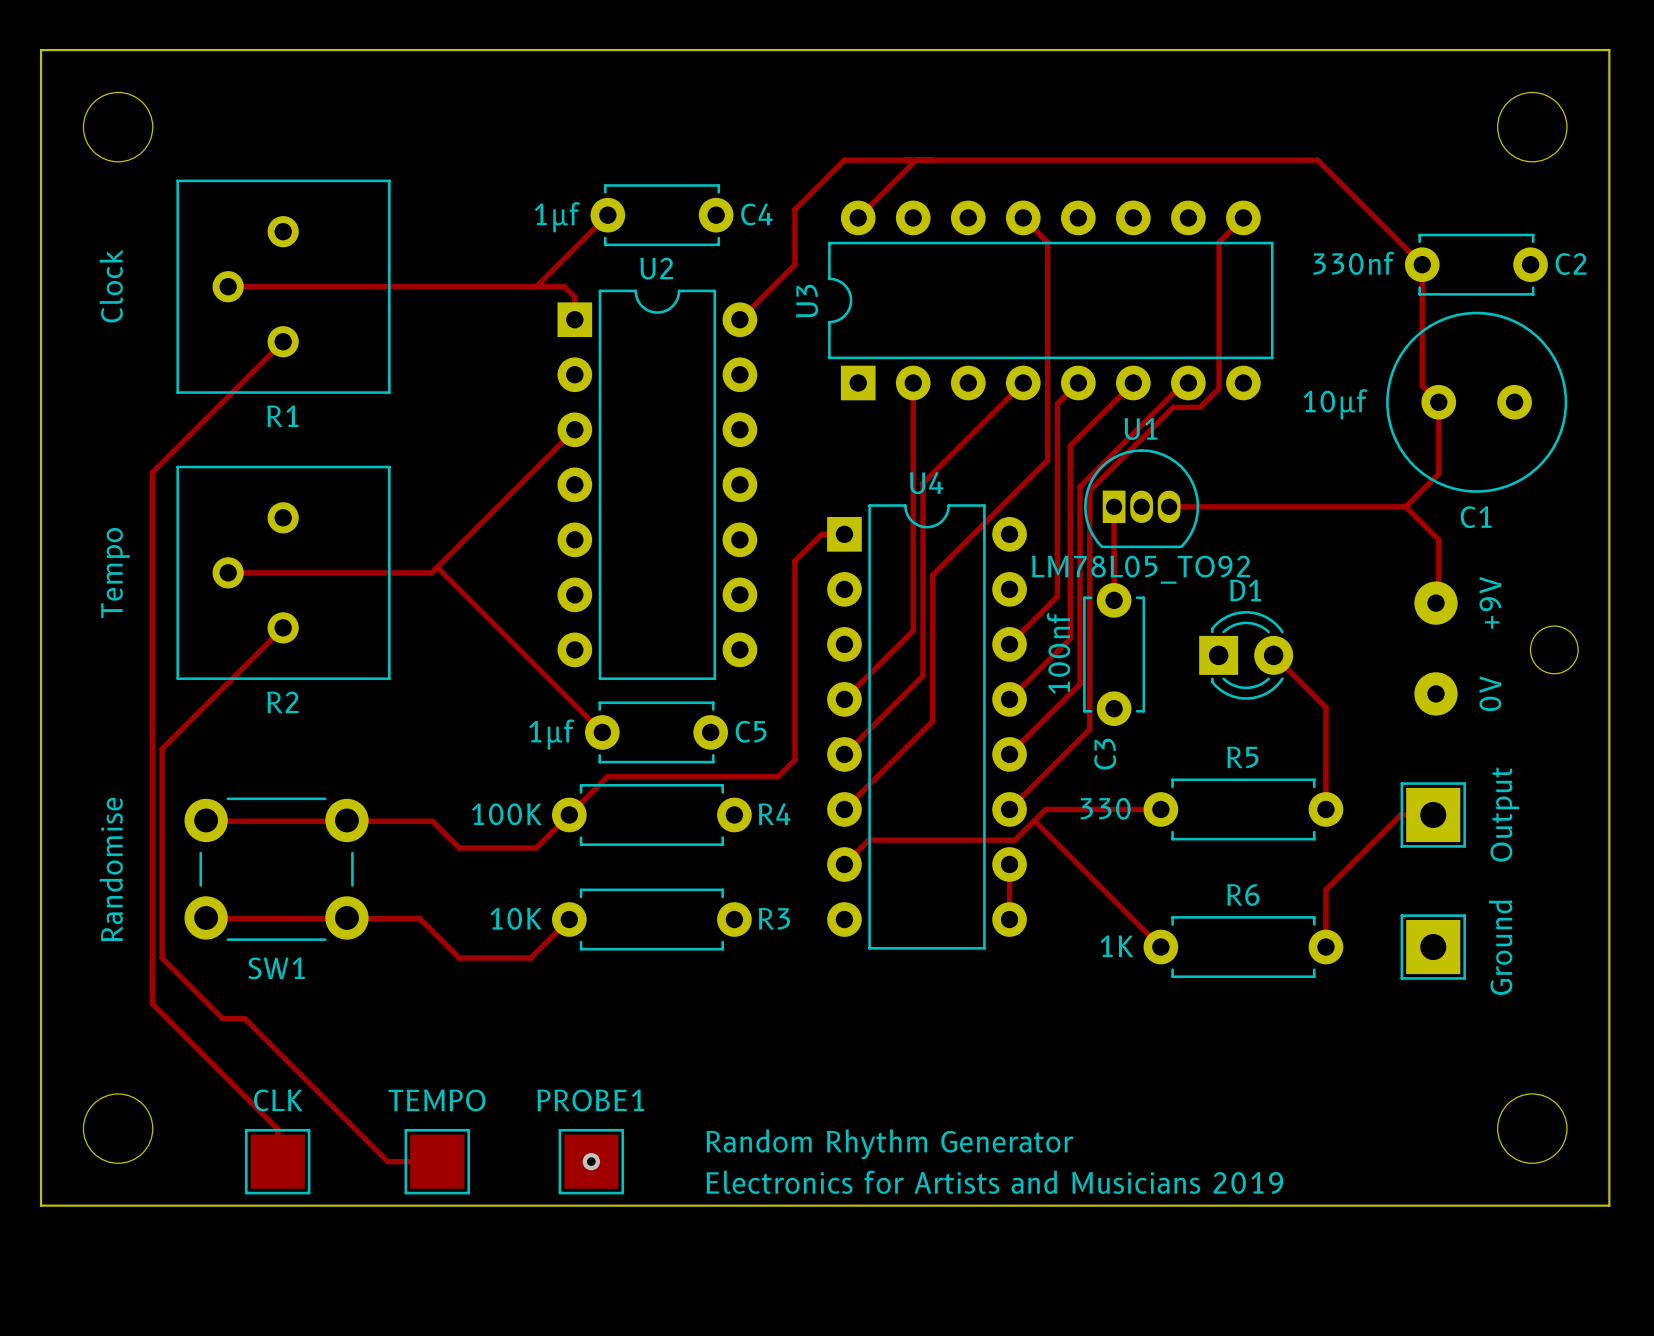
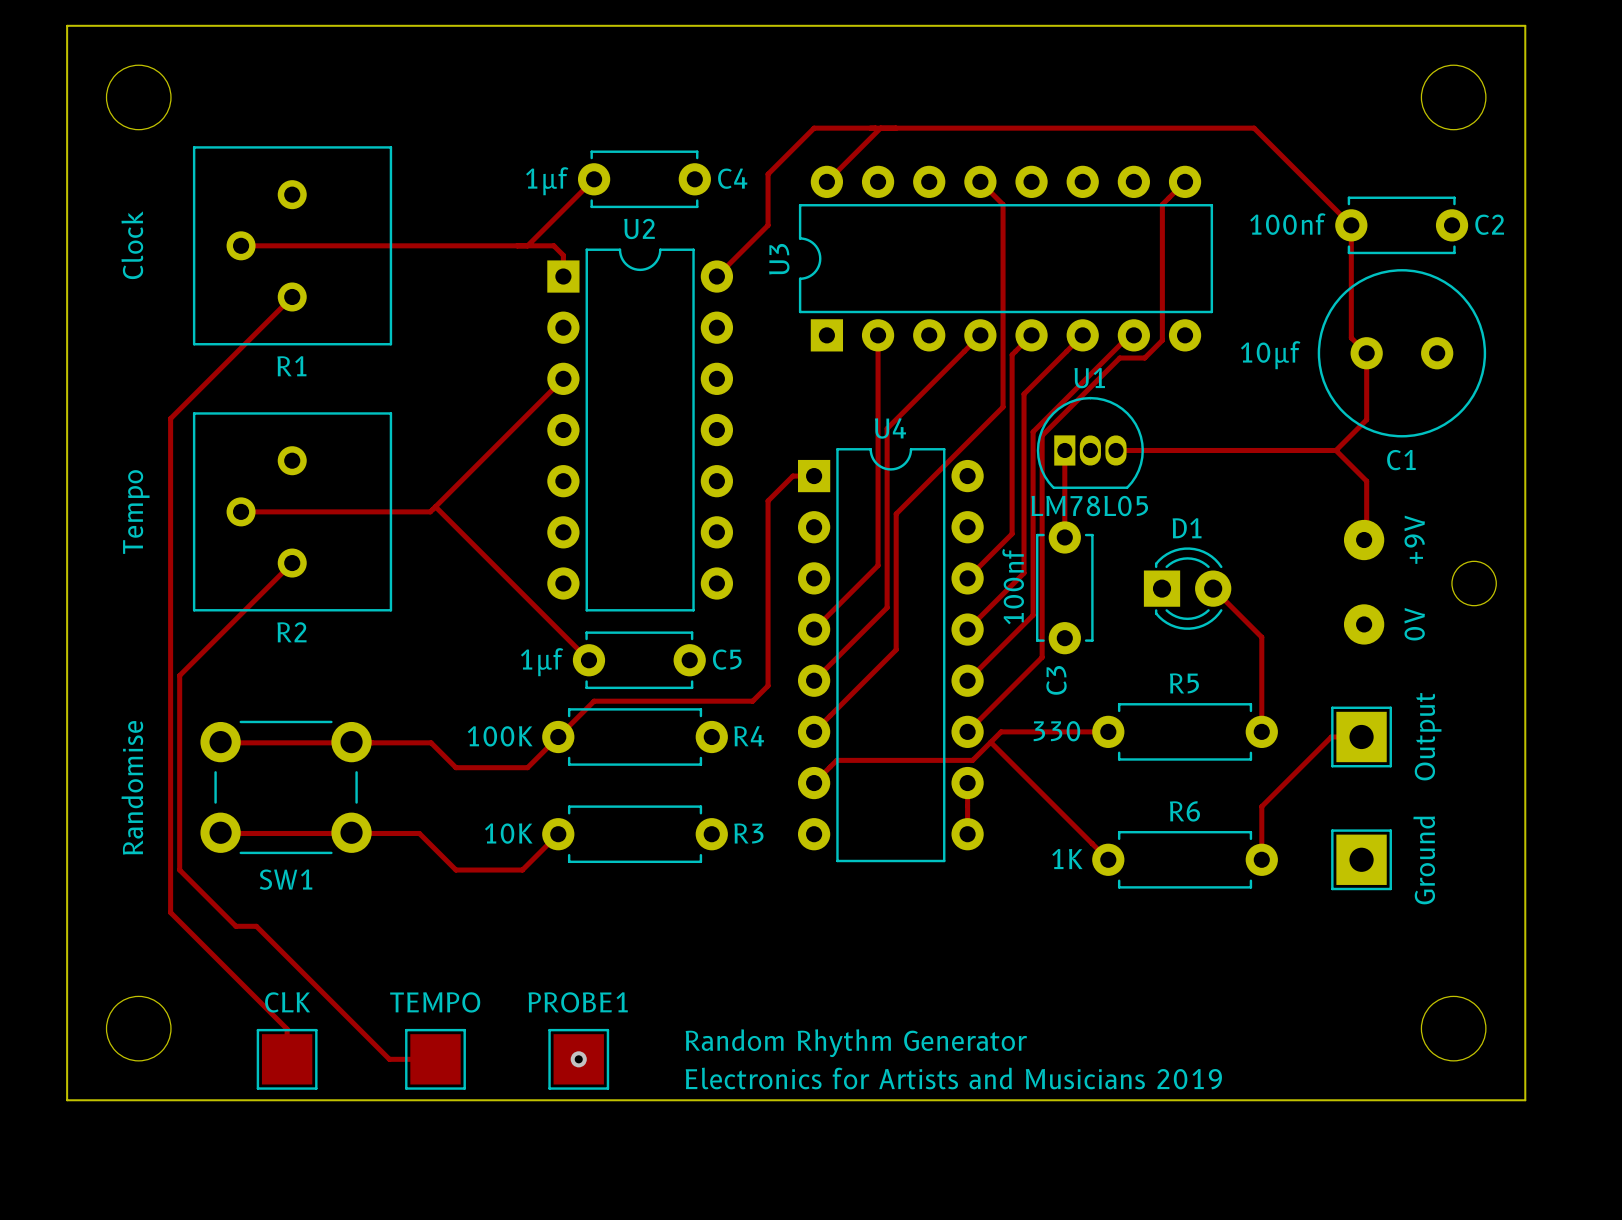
C2 value: 330nf (1354, 263) -> 100nf (1287, 224)
U1 value: LM78L05_TO92 (1141, 569) -> LM78L05 (1089, 506)

